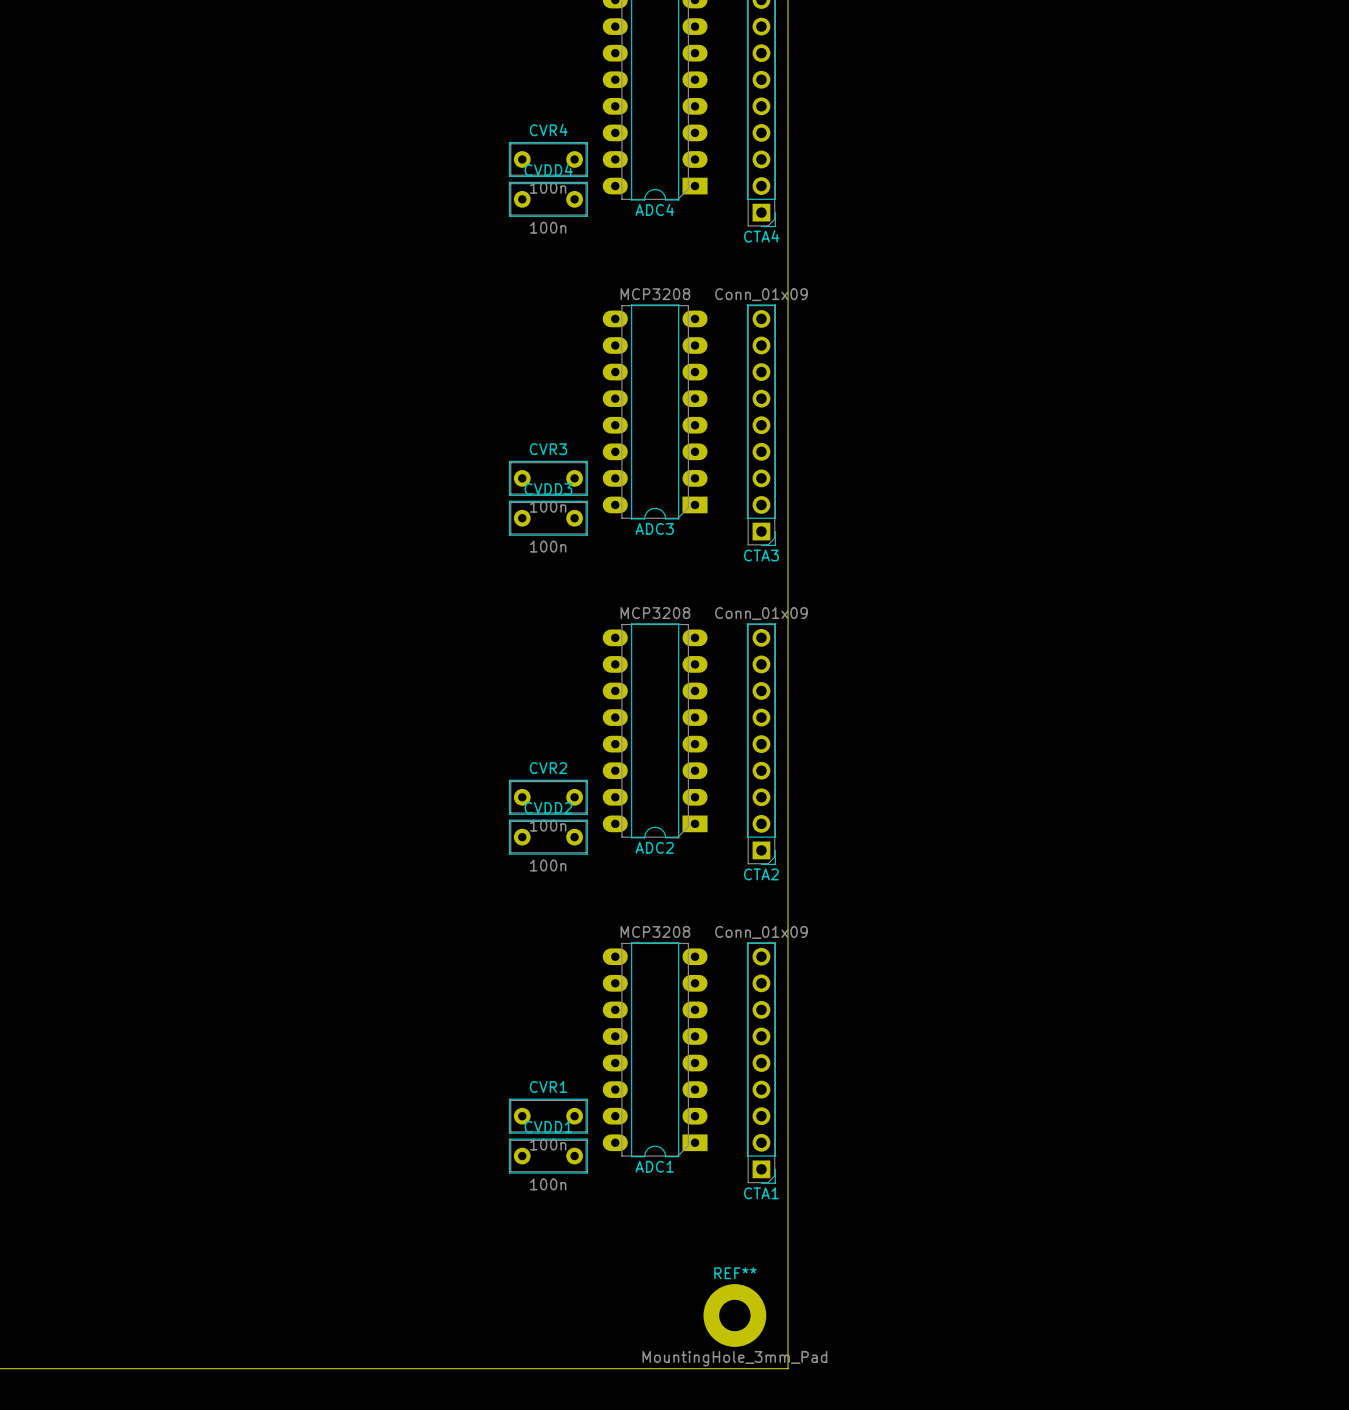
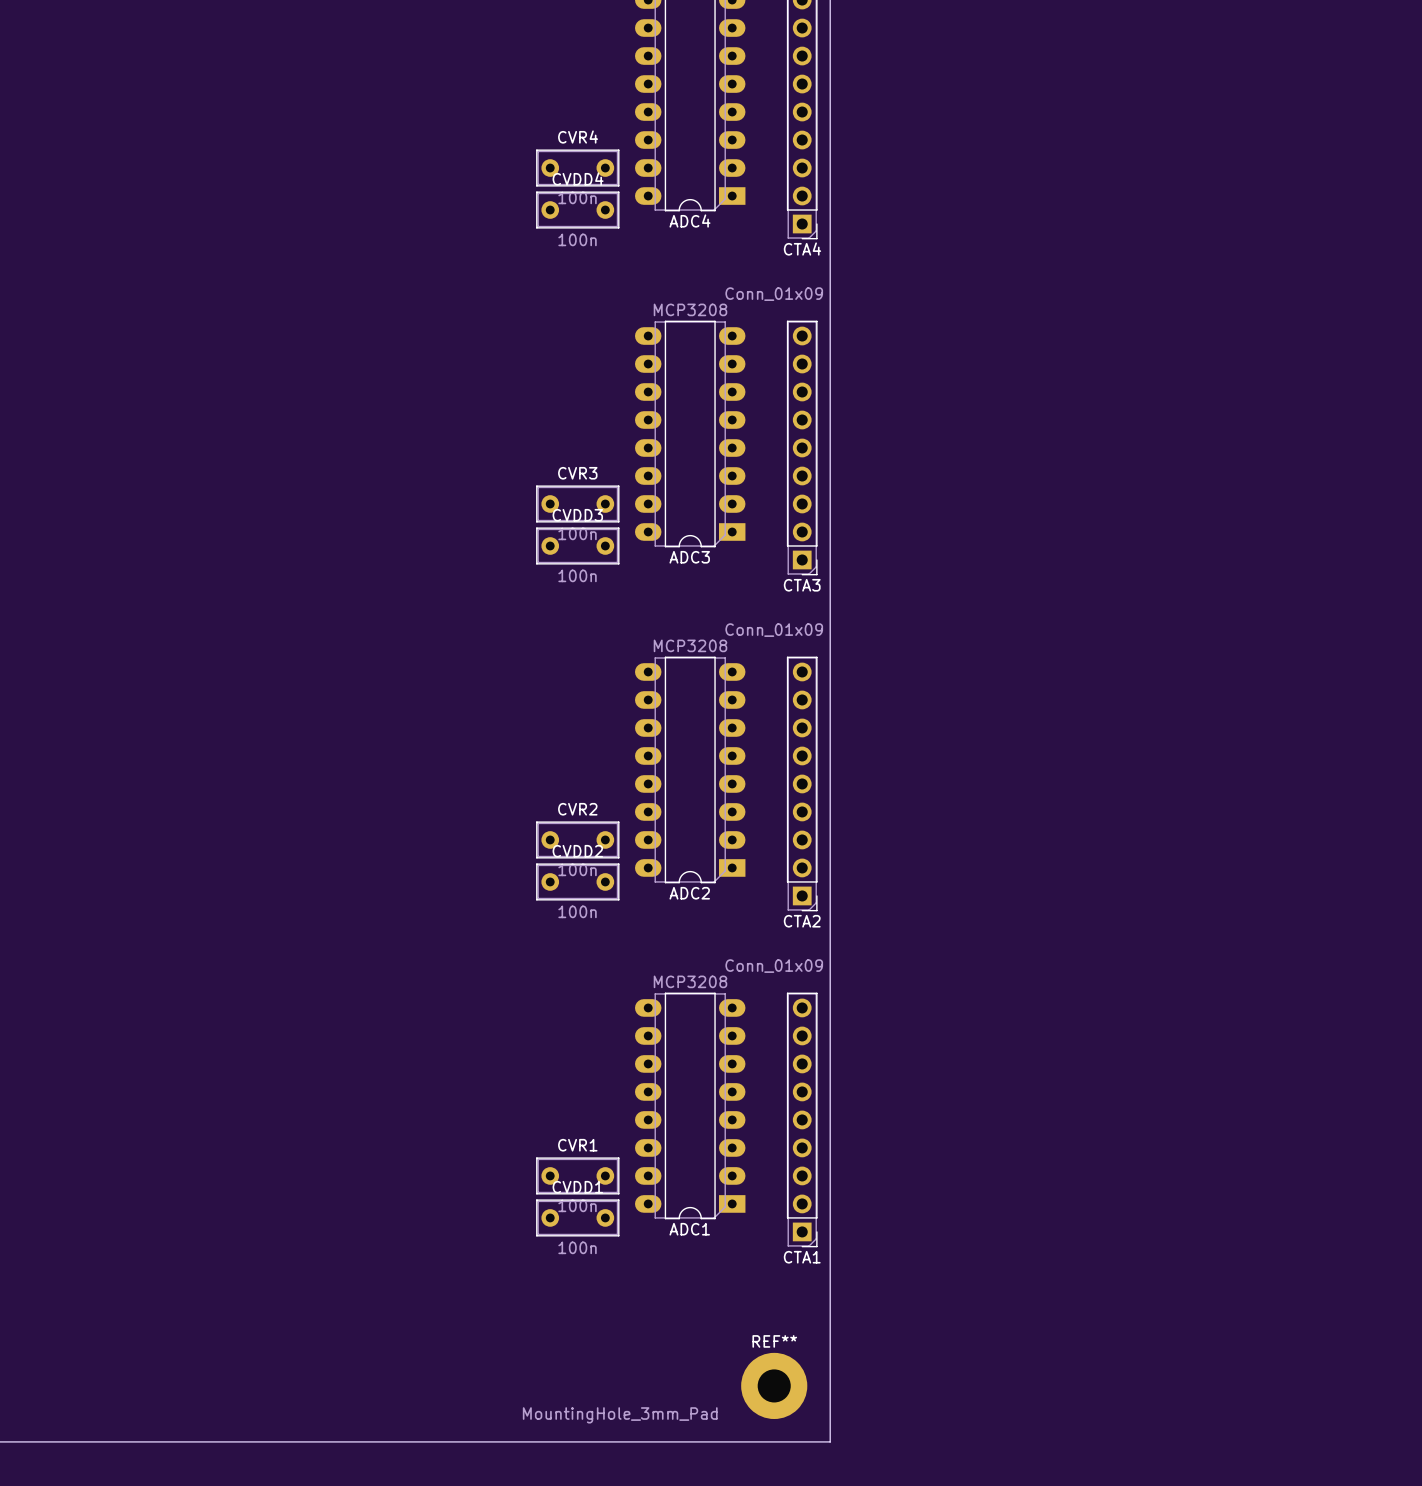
CTA3 value position: Conn_01x09 (761, 294) -> Conn_01x09 (774, 294)
CTA2 value position: Conn_01x09 (761, 613) -> Conn_01x09 (774, 630)
CTA1 value position: Conn_01x09 (761, 932) -> Conn_01x09 (774, 966)
REF** value position: MountingHole_3mm_Pad (734, 1358) -> MountingHole_3mm_Pad (620, 1415)

